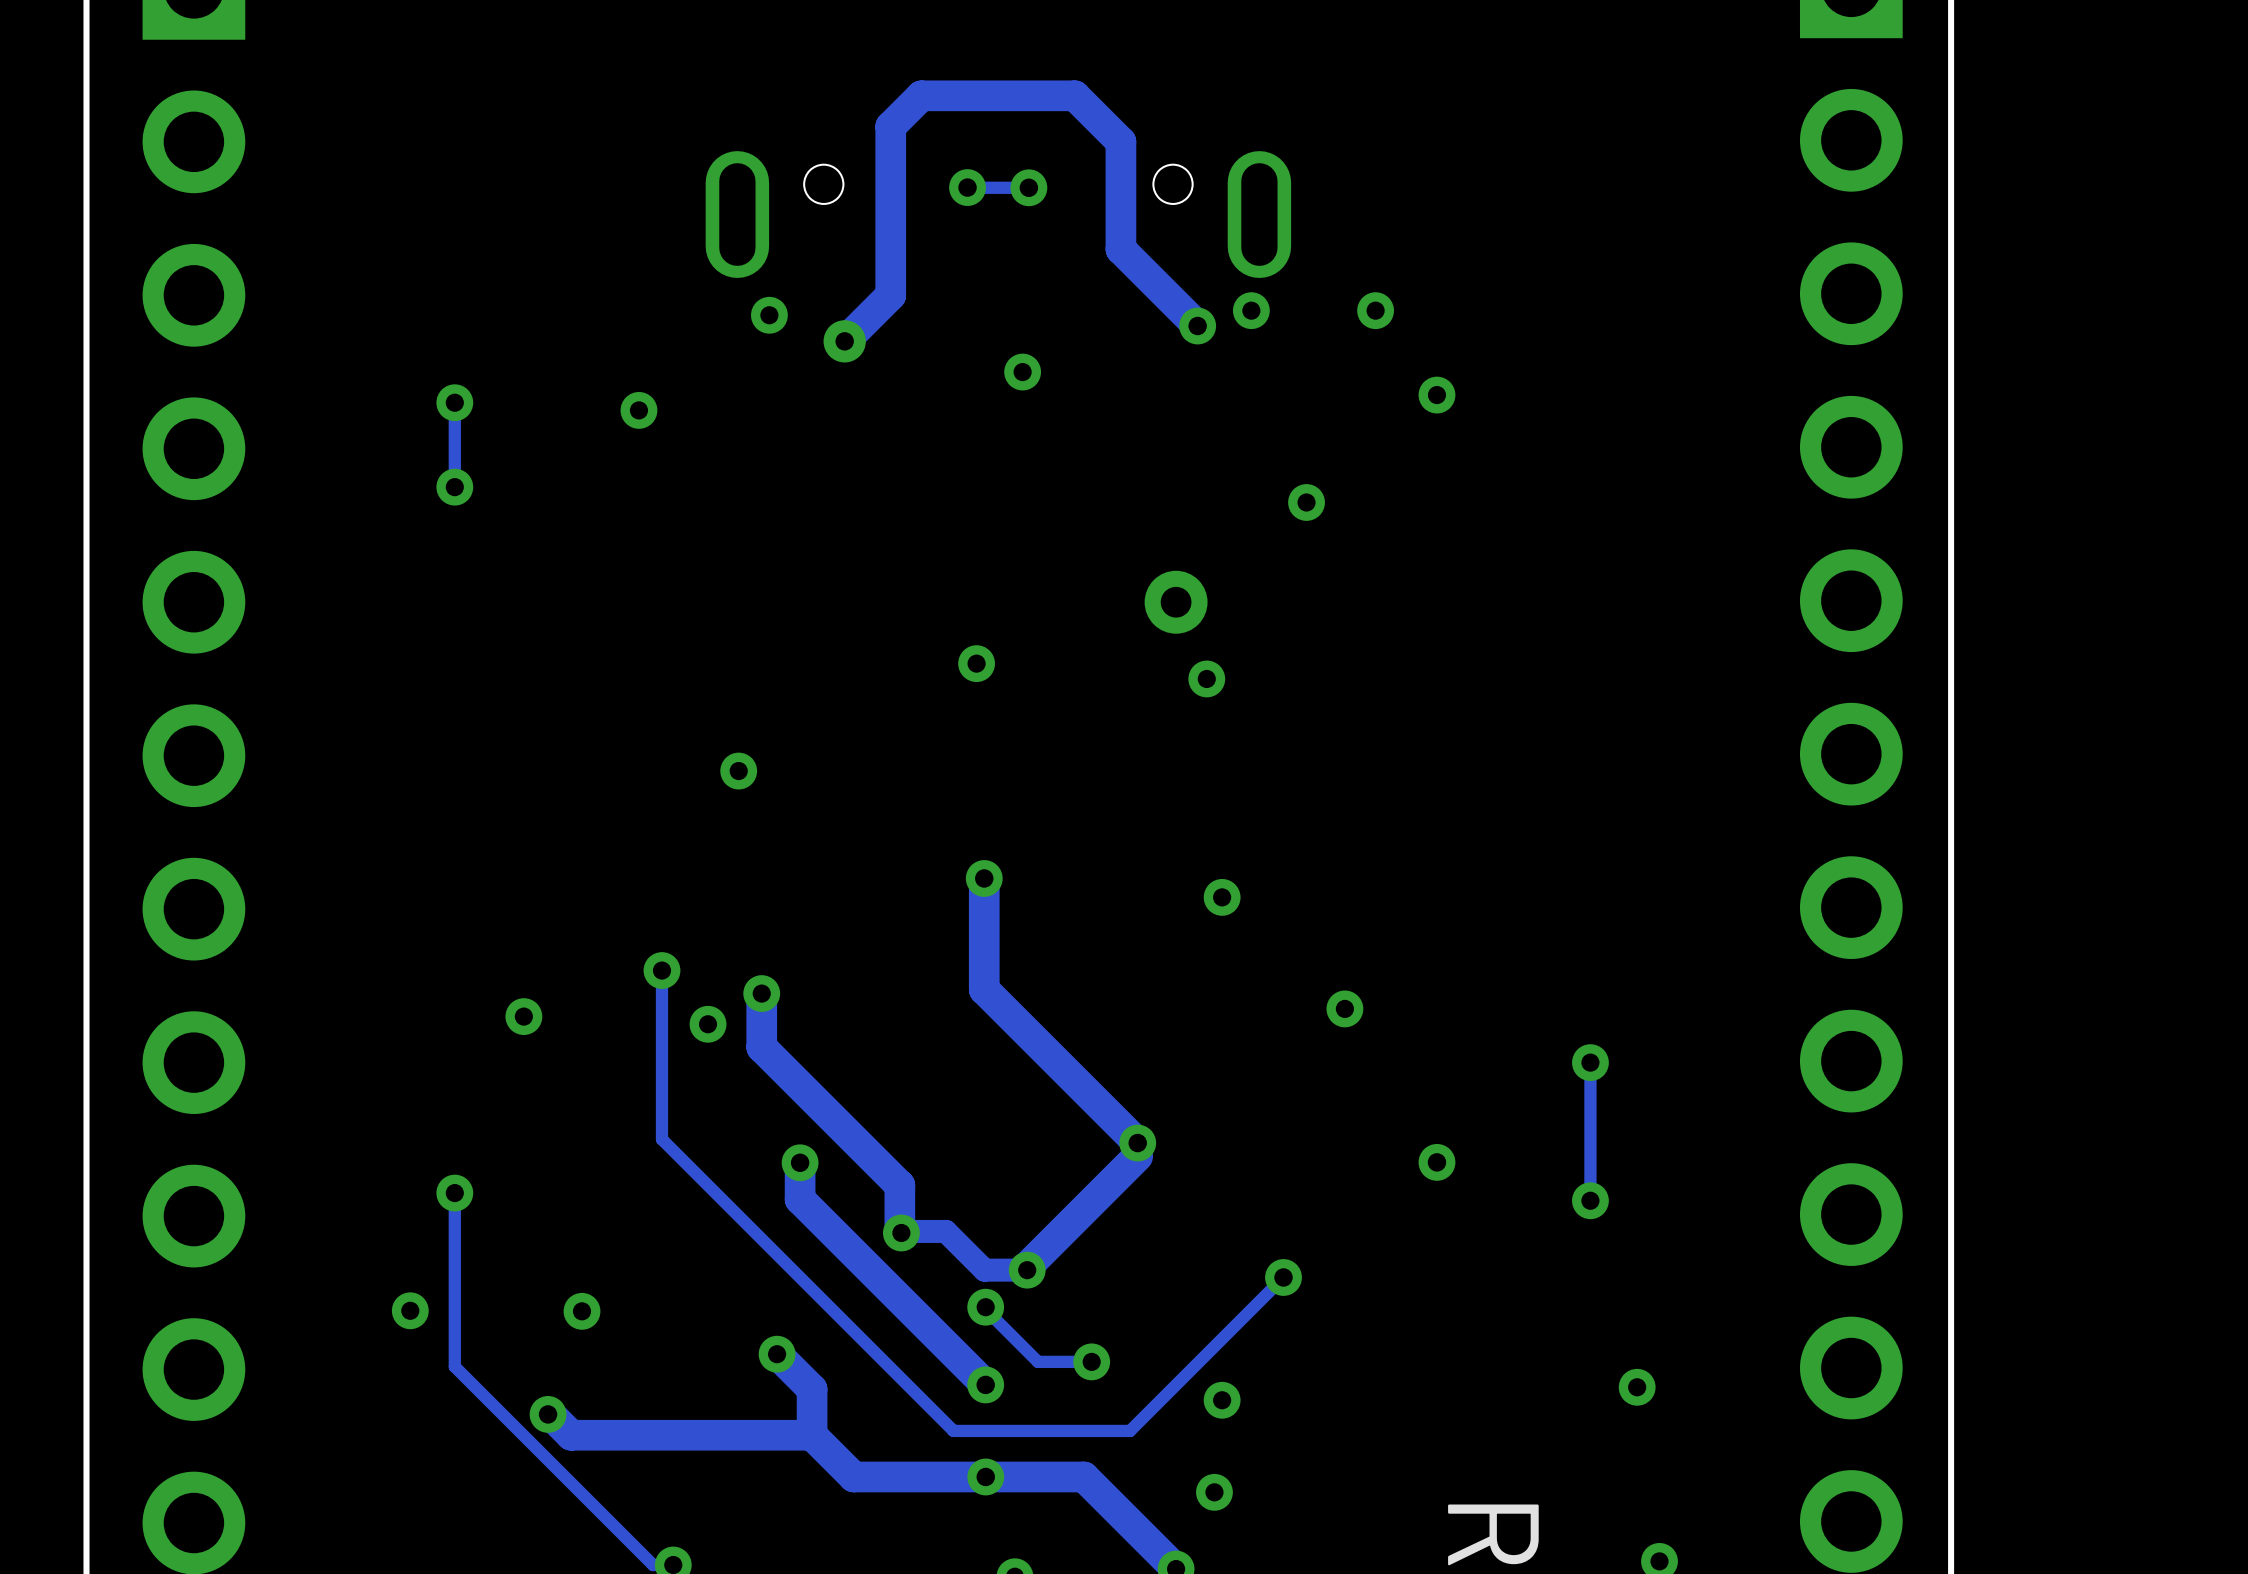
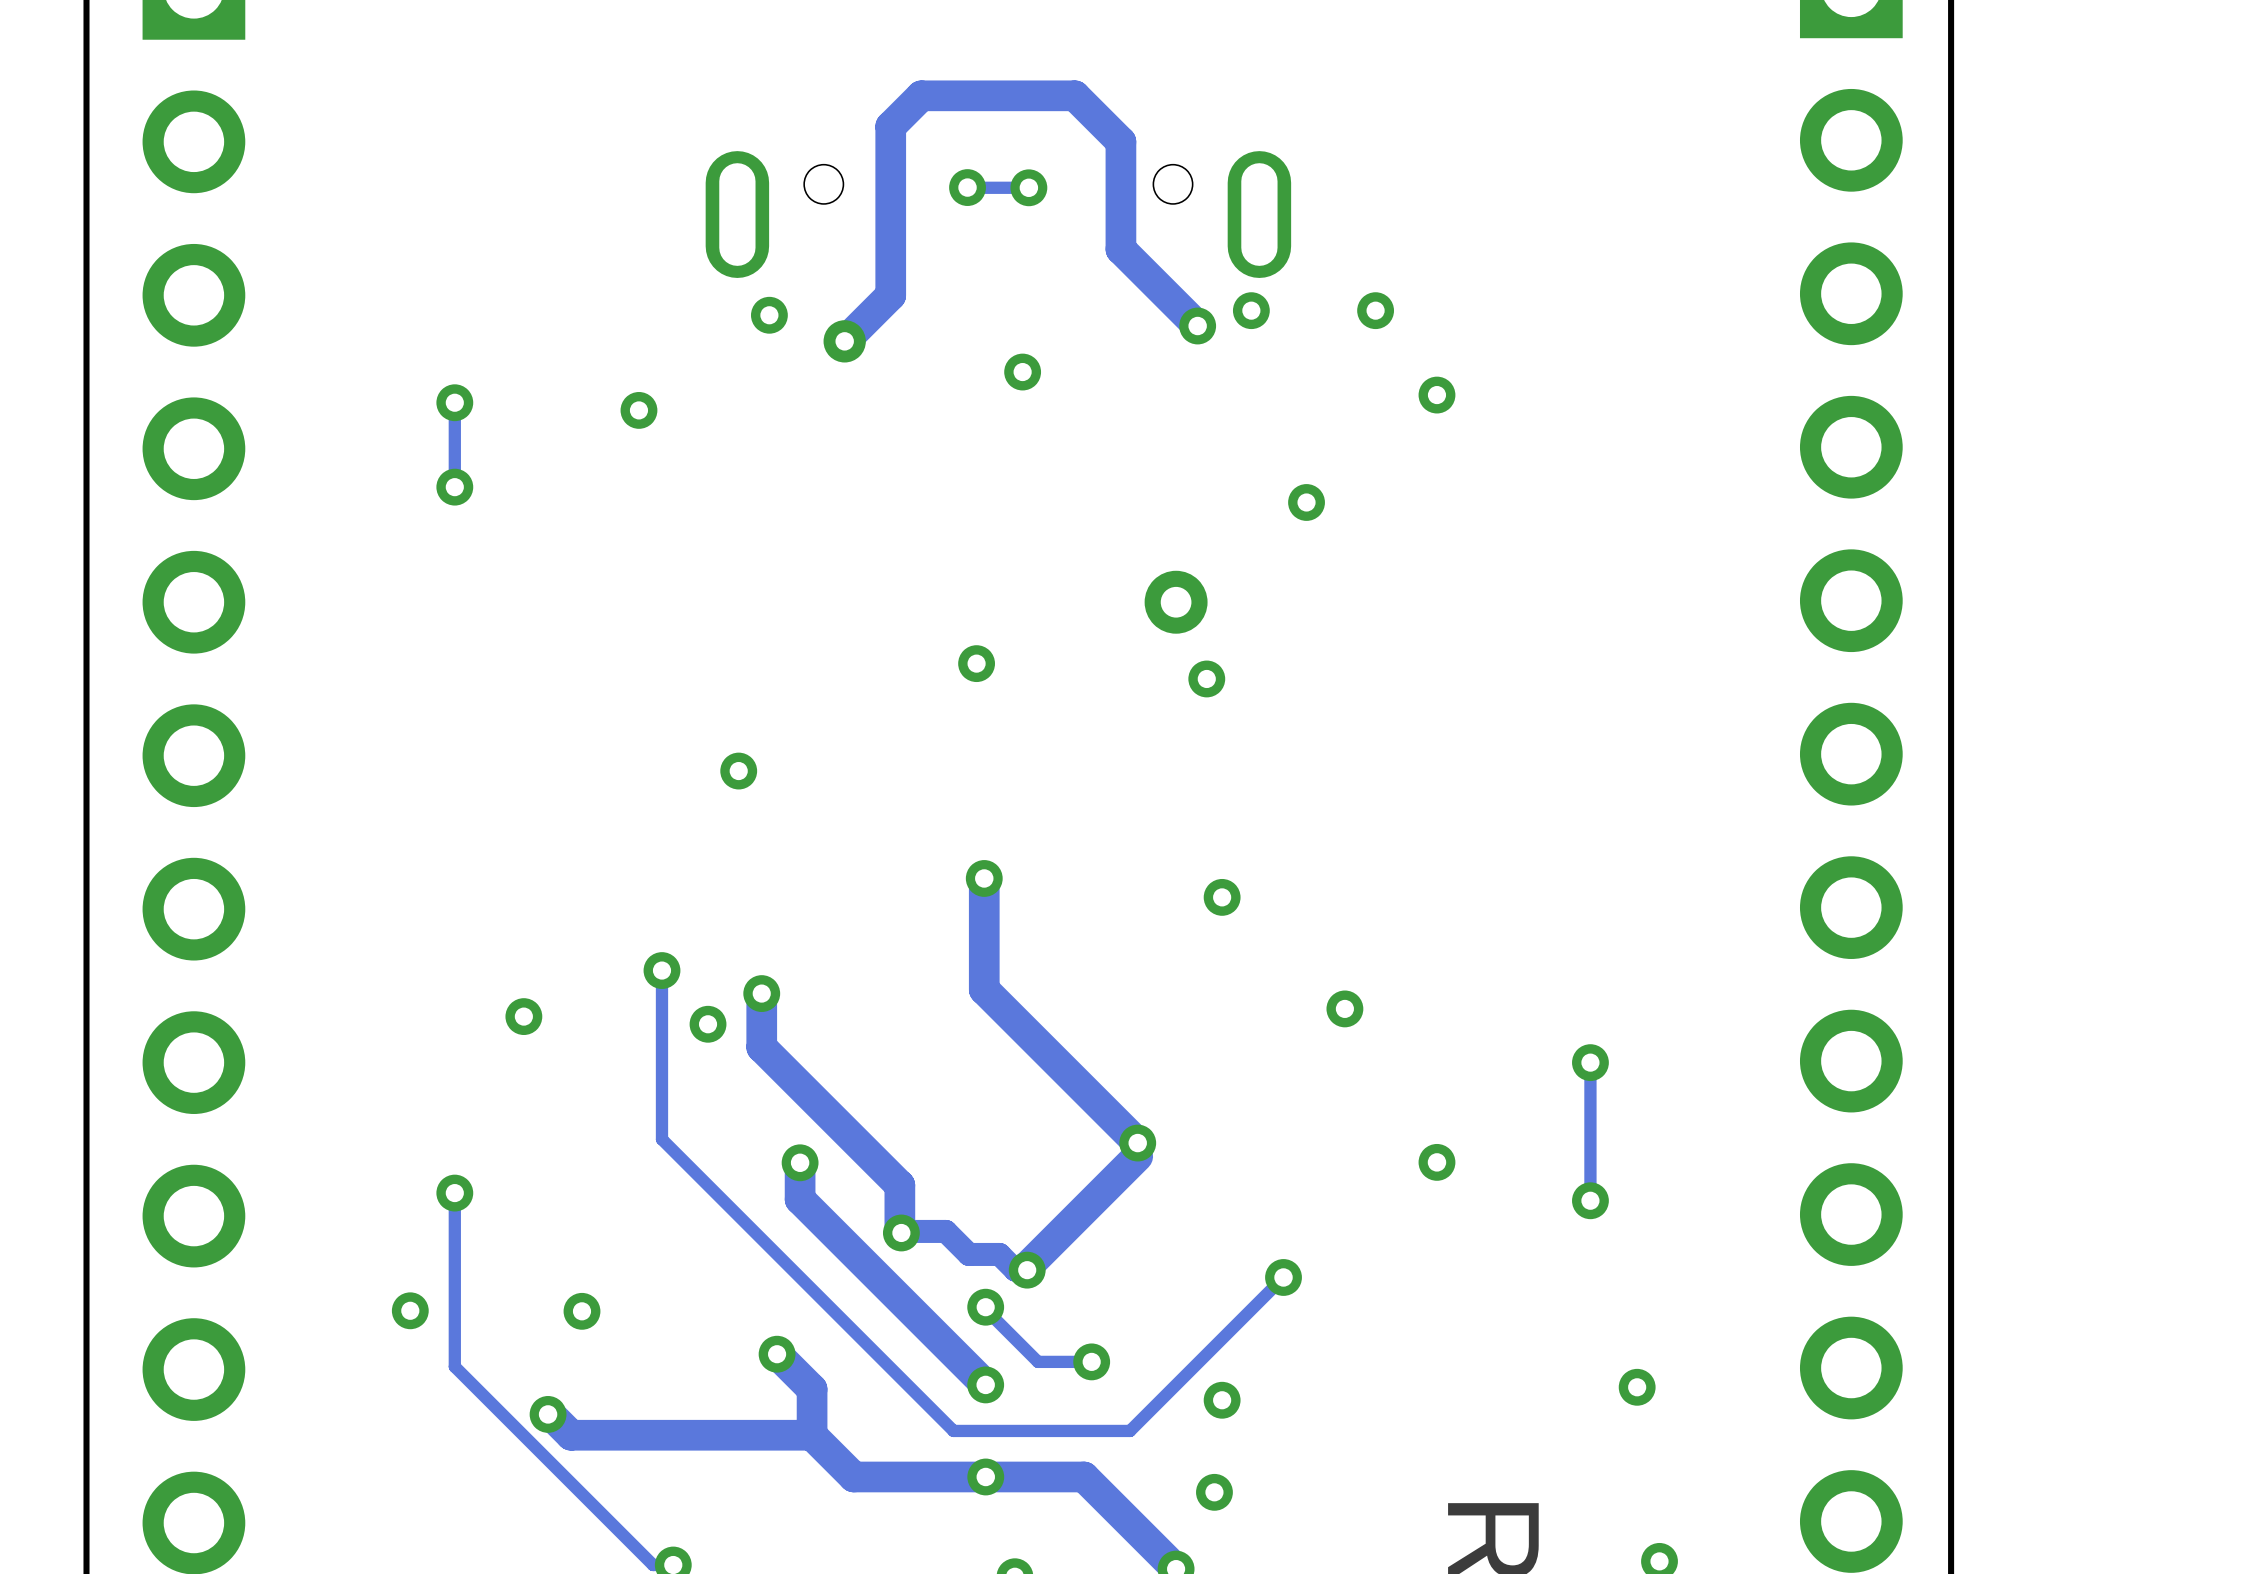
track: (968, 1254) (984, 1270) (1015, 1270) -> (968, 1254) (999, 1254) (1015, 1270)

